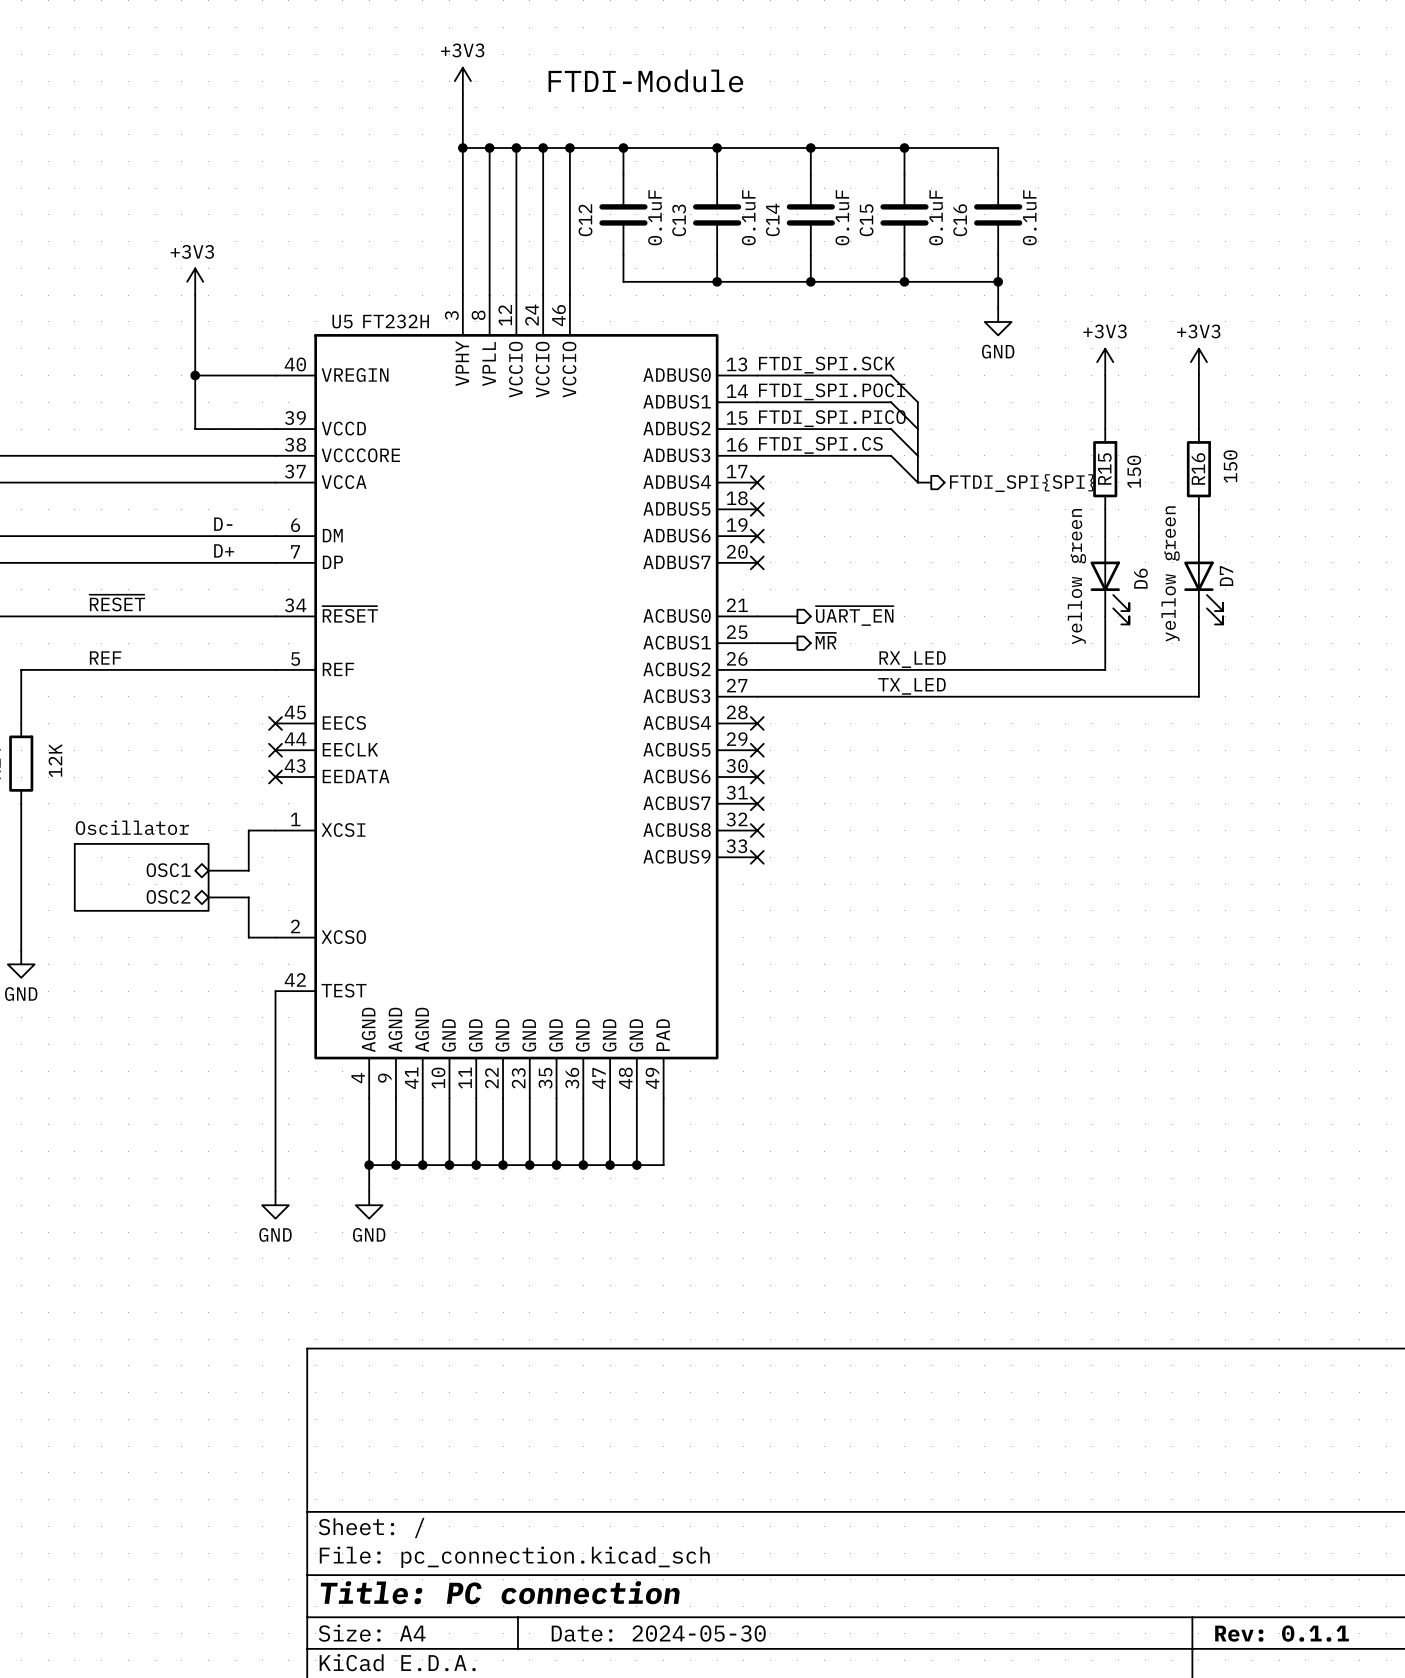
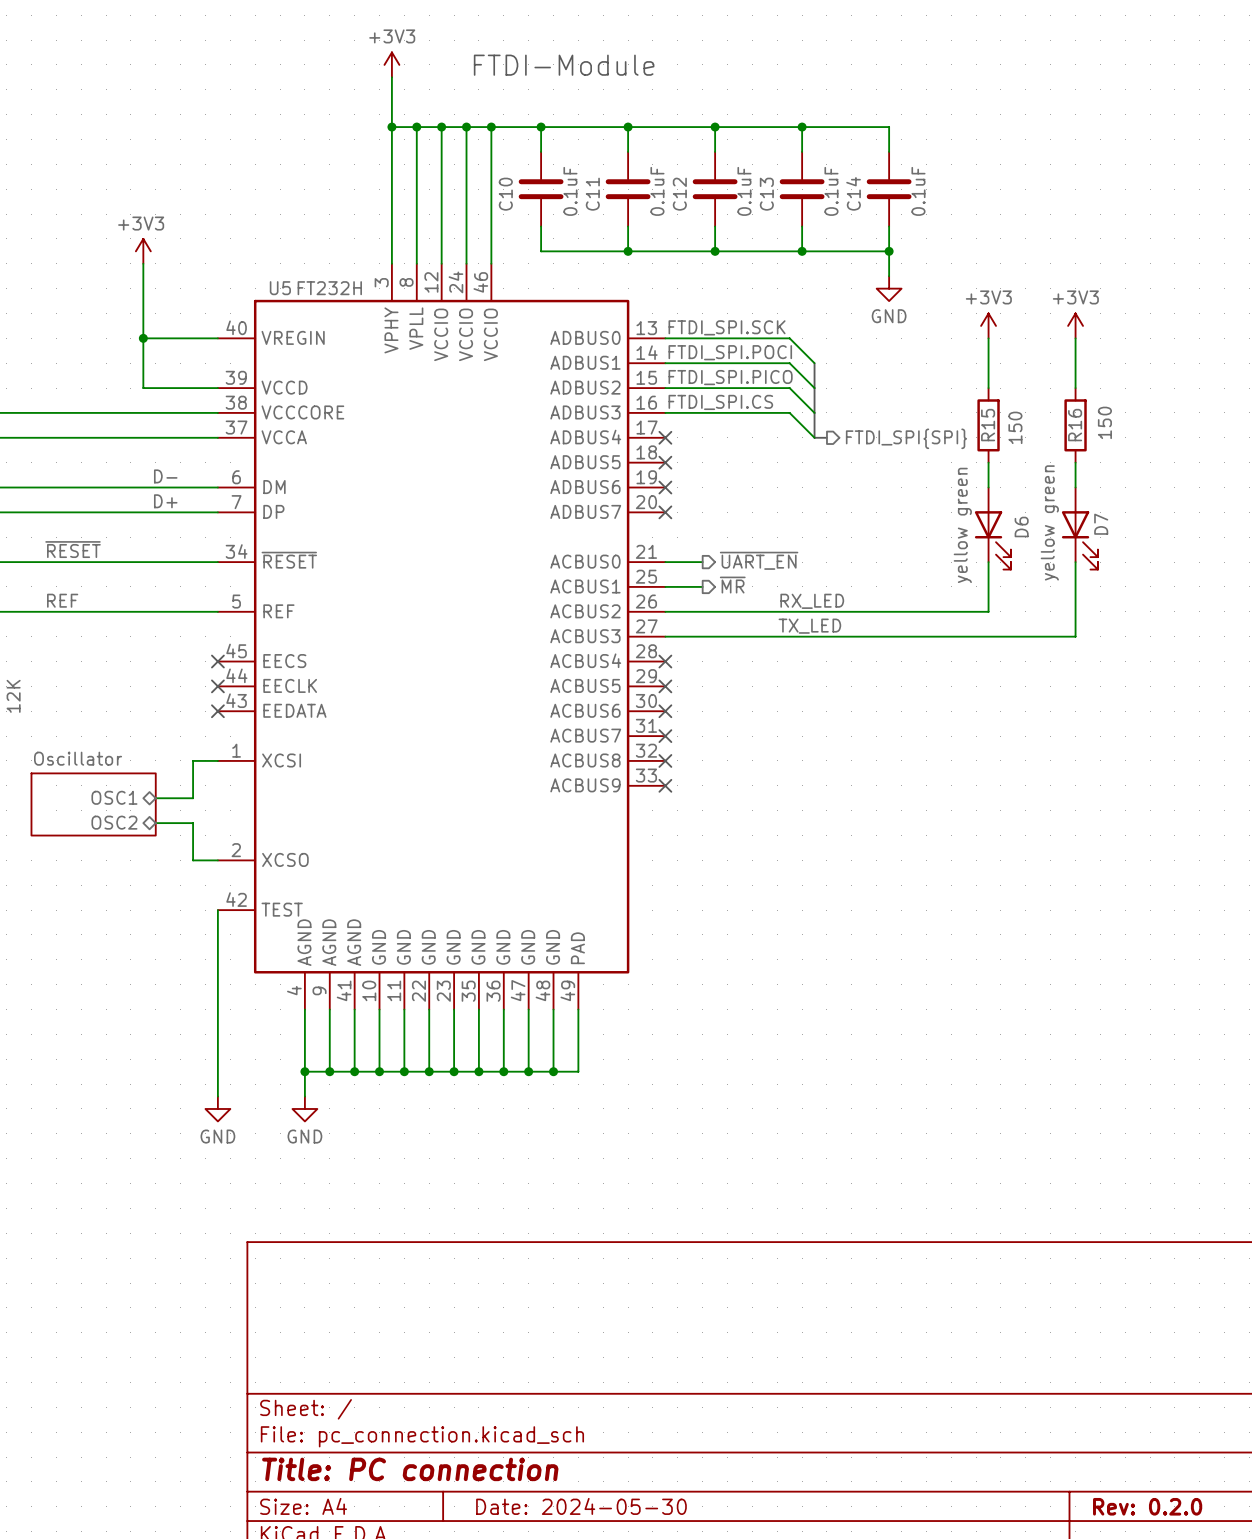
C14 name: C14 (772, 219) -> C12 (679, 194)
C12 name: C12 (585, 220) -> C10 (505, 194)
C13 name: C13 (679, 220) -> C11 (592, 194)
C15 name: C15 (866, 220) -> C13 (766, 194)
C16 name: C16 (960, 220) -> C14 (853, 193)
title block: Rev: 0.1.1 (1282, 1633) -> Rev: 0.2.0 (1147, 1506)

